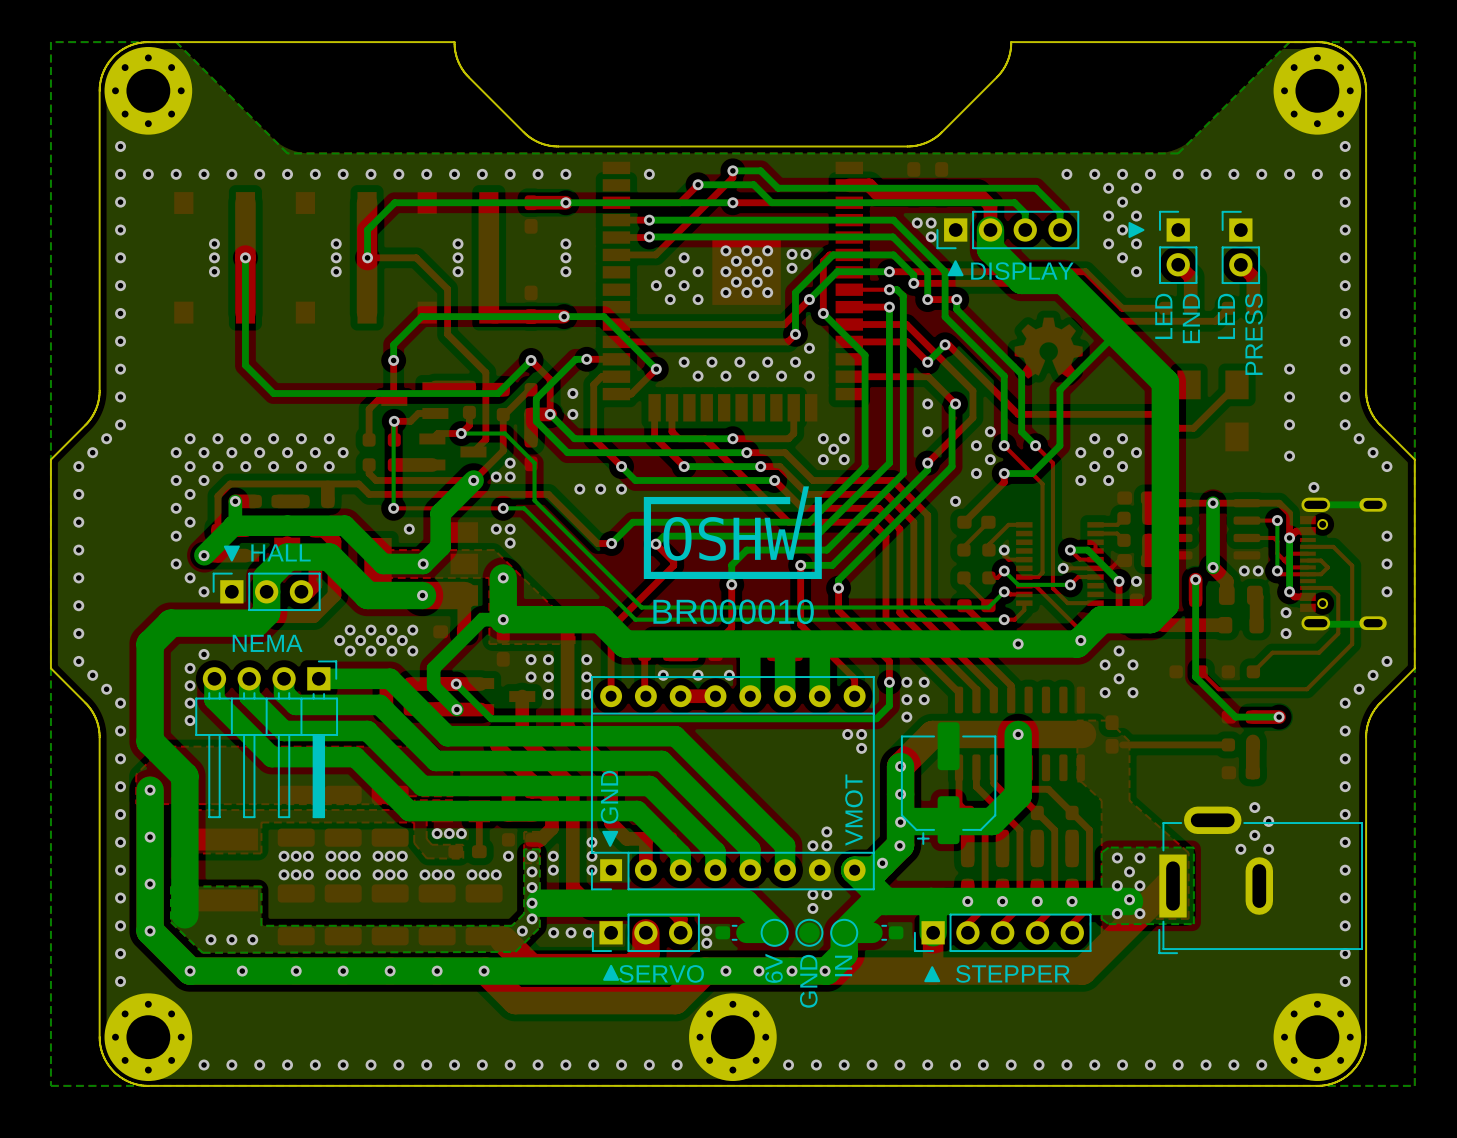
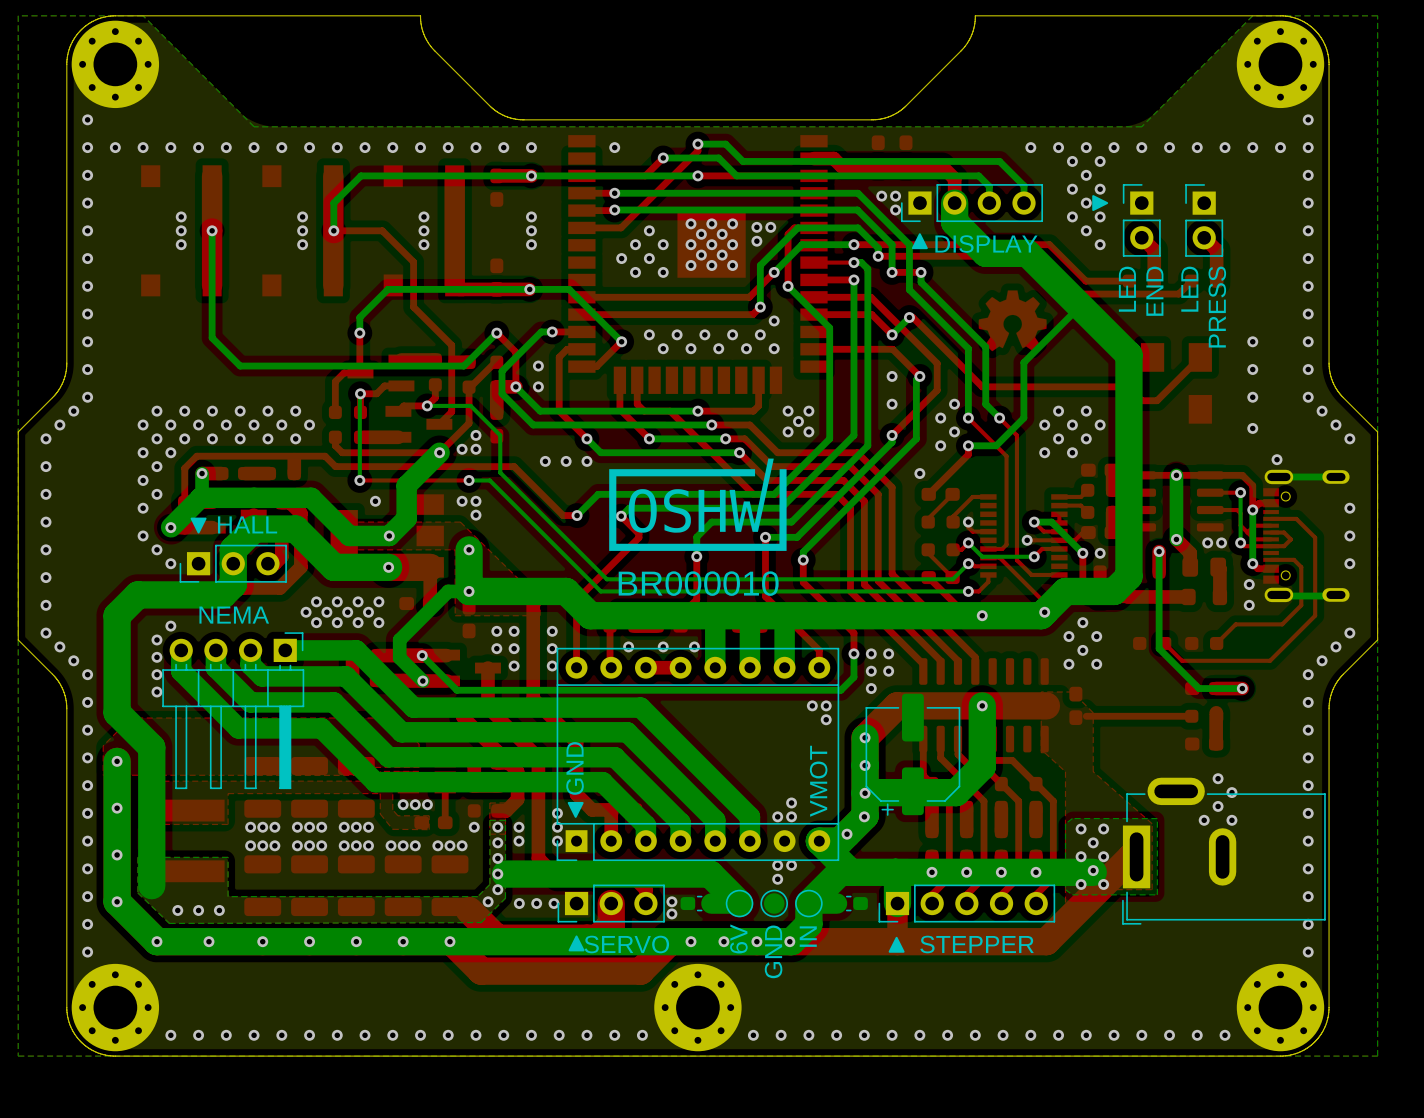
part footprint: [212, 572, 321, 611] -> [179, 544, 287, 583]

